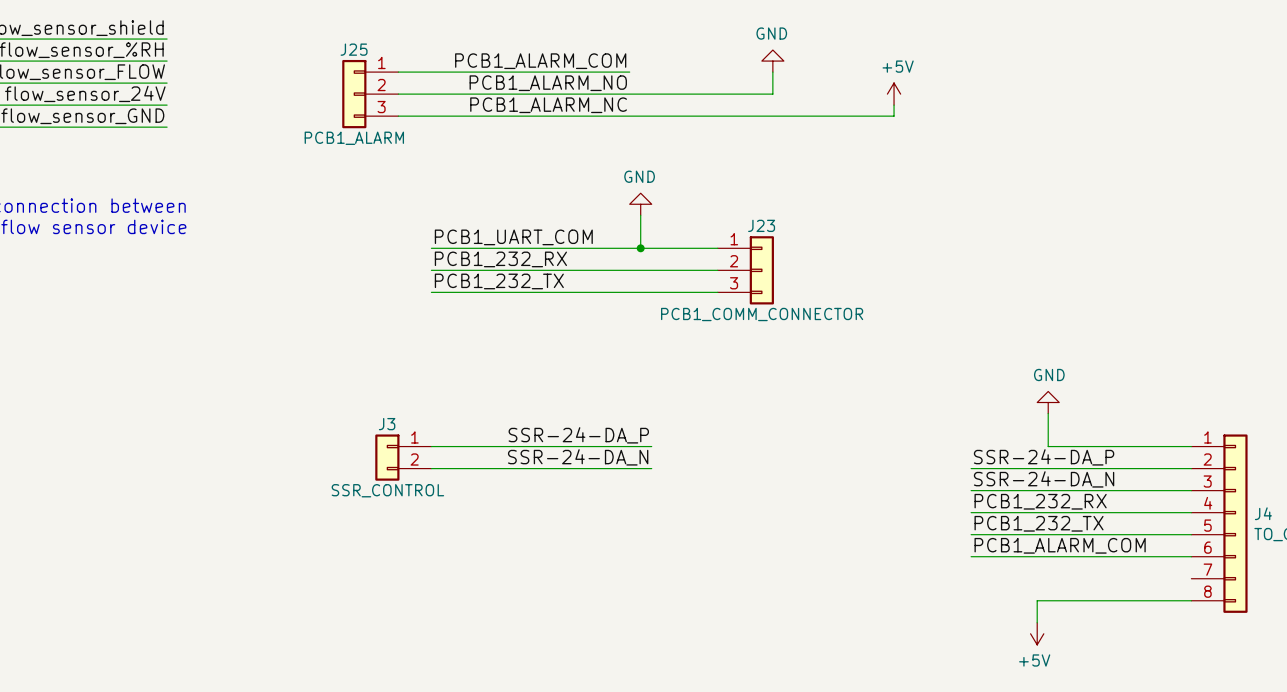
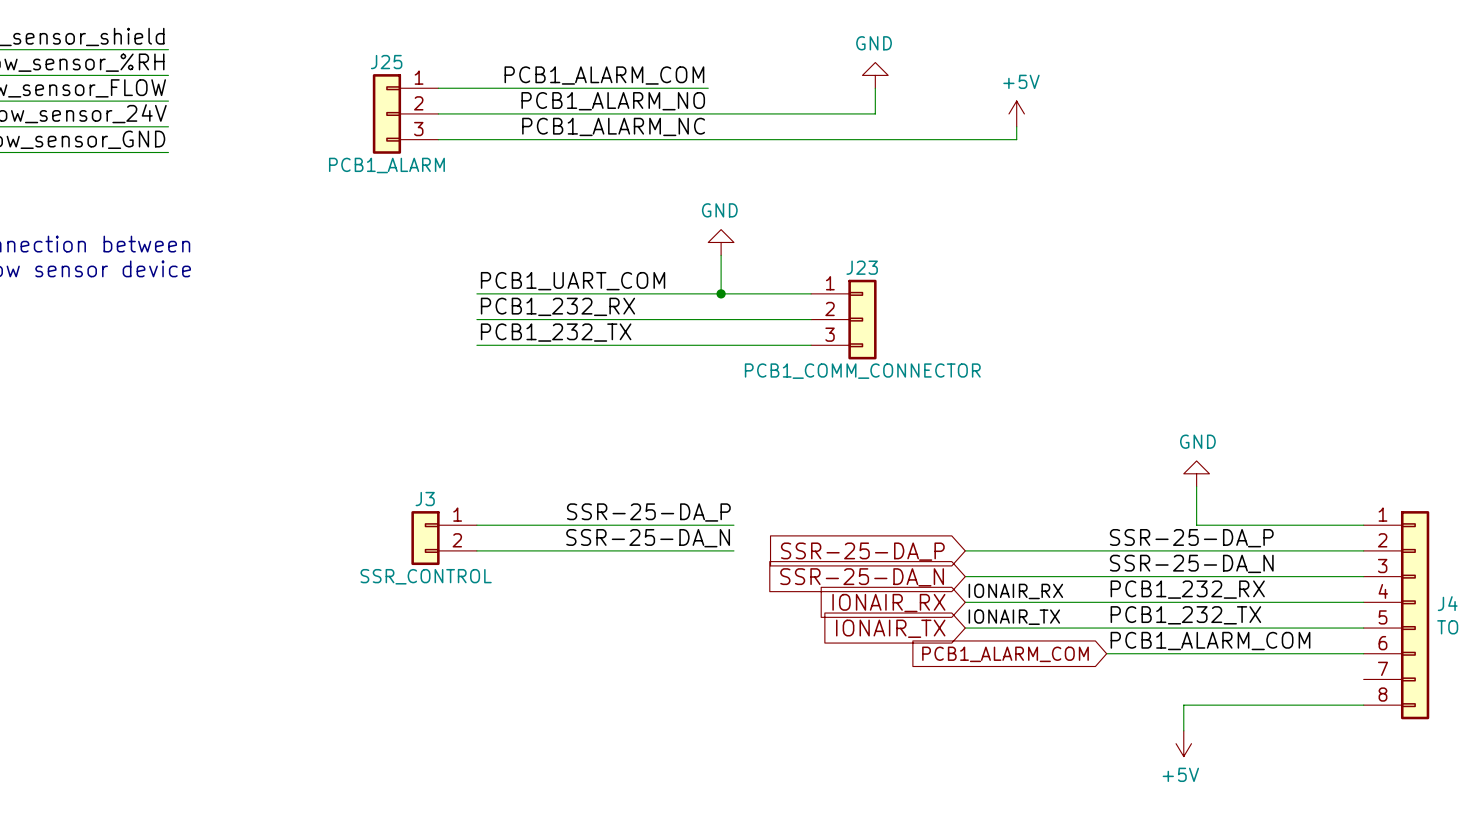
label: SSR-24-DA_P (578, 435) -> SSR-25-DA_P (648, 512)
label: SSR-24-DA_N (578, 457) -> SSR-25-DA_N (648, 538)
label: SSR-24-DA_P (1044, 457) -> SSR-25-DA_P (1191, 538)
wire: none -> (965, 550) (1106, 550)
global label: none -> SSR-25-DA_P (862, 551)
label: SSR-24-DA_N (1044, 479) -> SSR-25-DA_N (1191, 563)
wire: none -> (965, 576) (1106, 576)
global label: none -> SSR-25-DA_N (862, 577)
label: none -> IONAIR_RX (1015, 591)
wire: none -> (965, 602) (1106, 602)
global label: none -> IONAIR_RX (888, 603)
label: none -> IONAIR_TX (1014, 617)
wire: none -> (965, 628) (1106, 628)
global label: none -> IONAIR_TX (890, 628)
global label: none -> PCB1_ALARM_COM (1005, 654)

